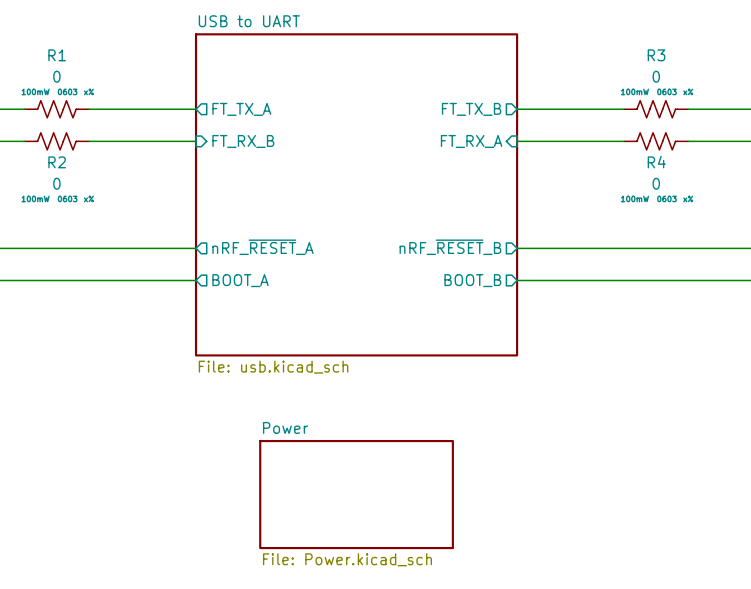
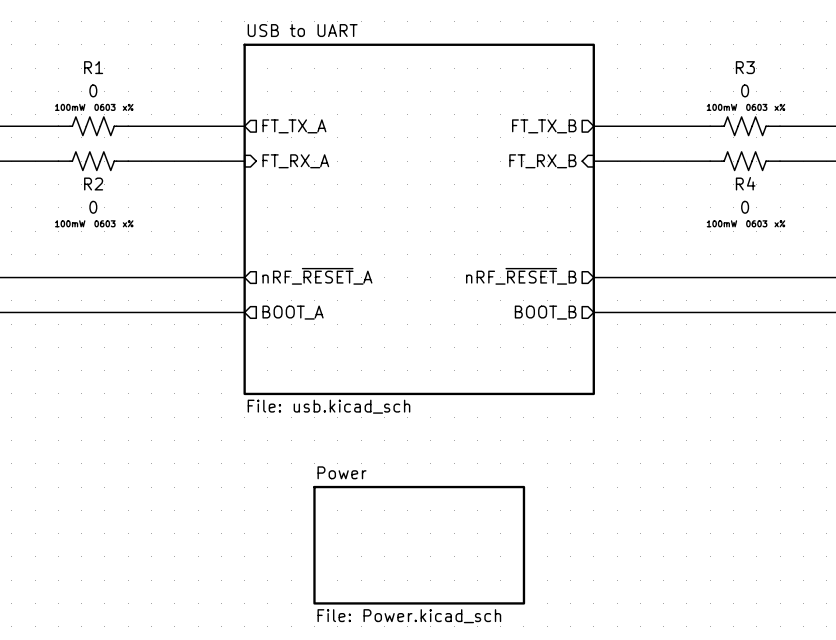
sheet pin: FT_RX_B (243, 141) -> FT_RX_A (295, 161)
sheet pin: FT_RX_A (471, 141) -> FT_RX_B (542, 161)

